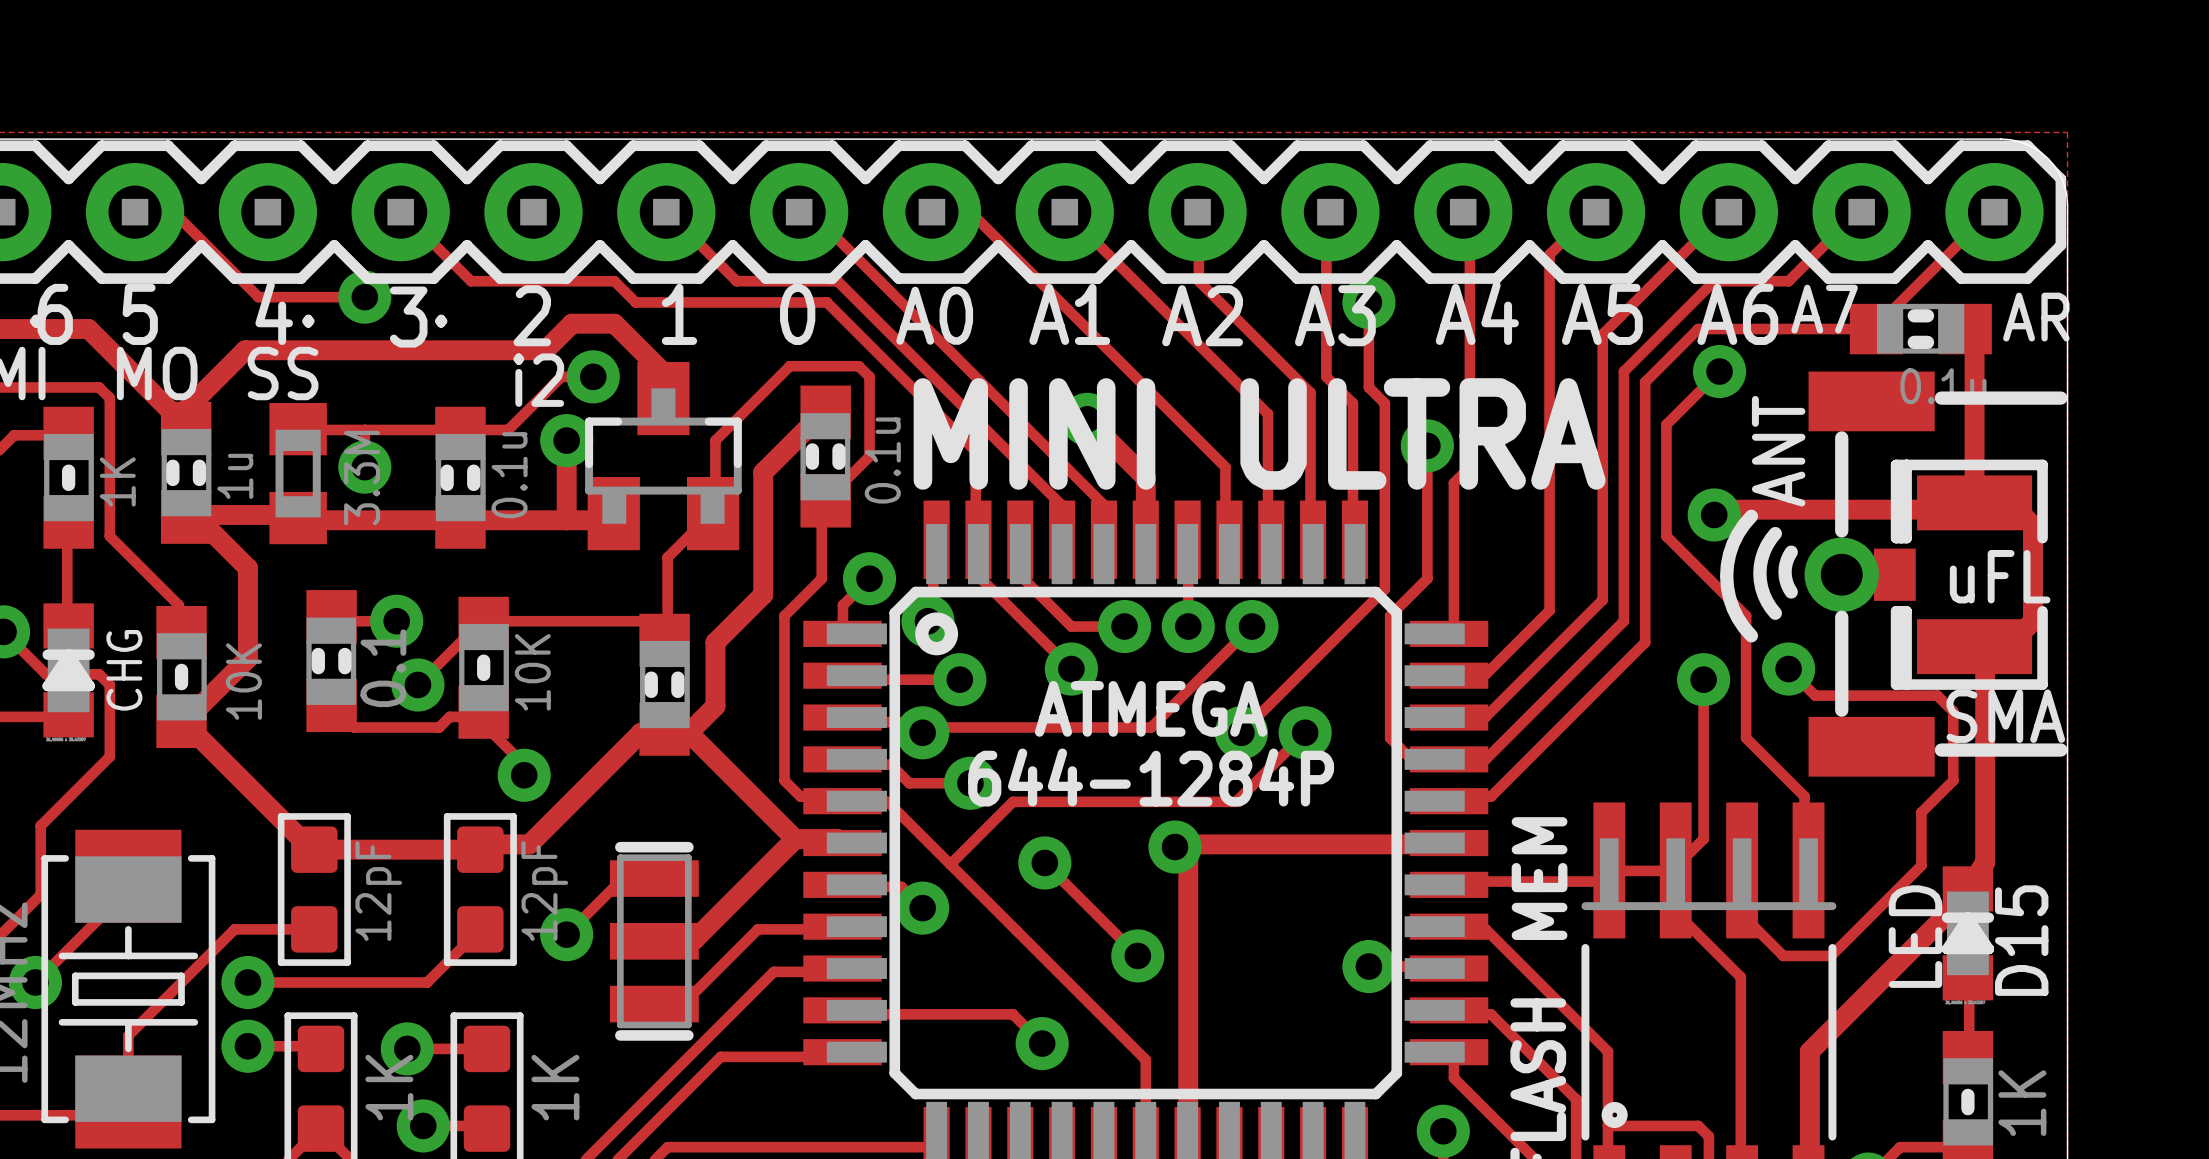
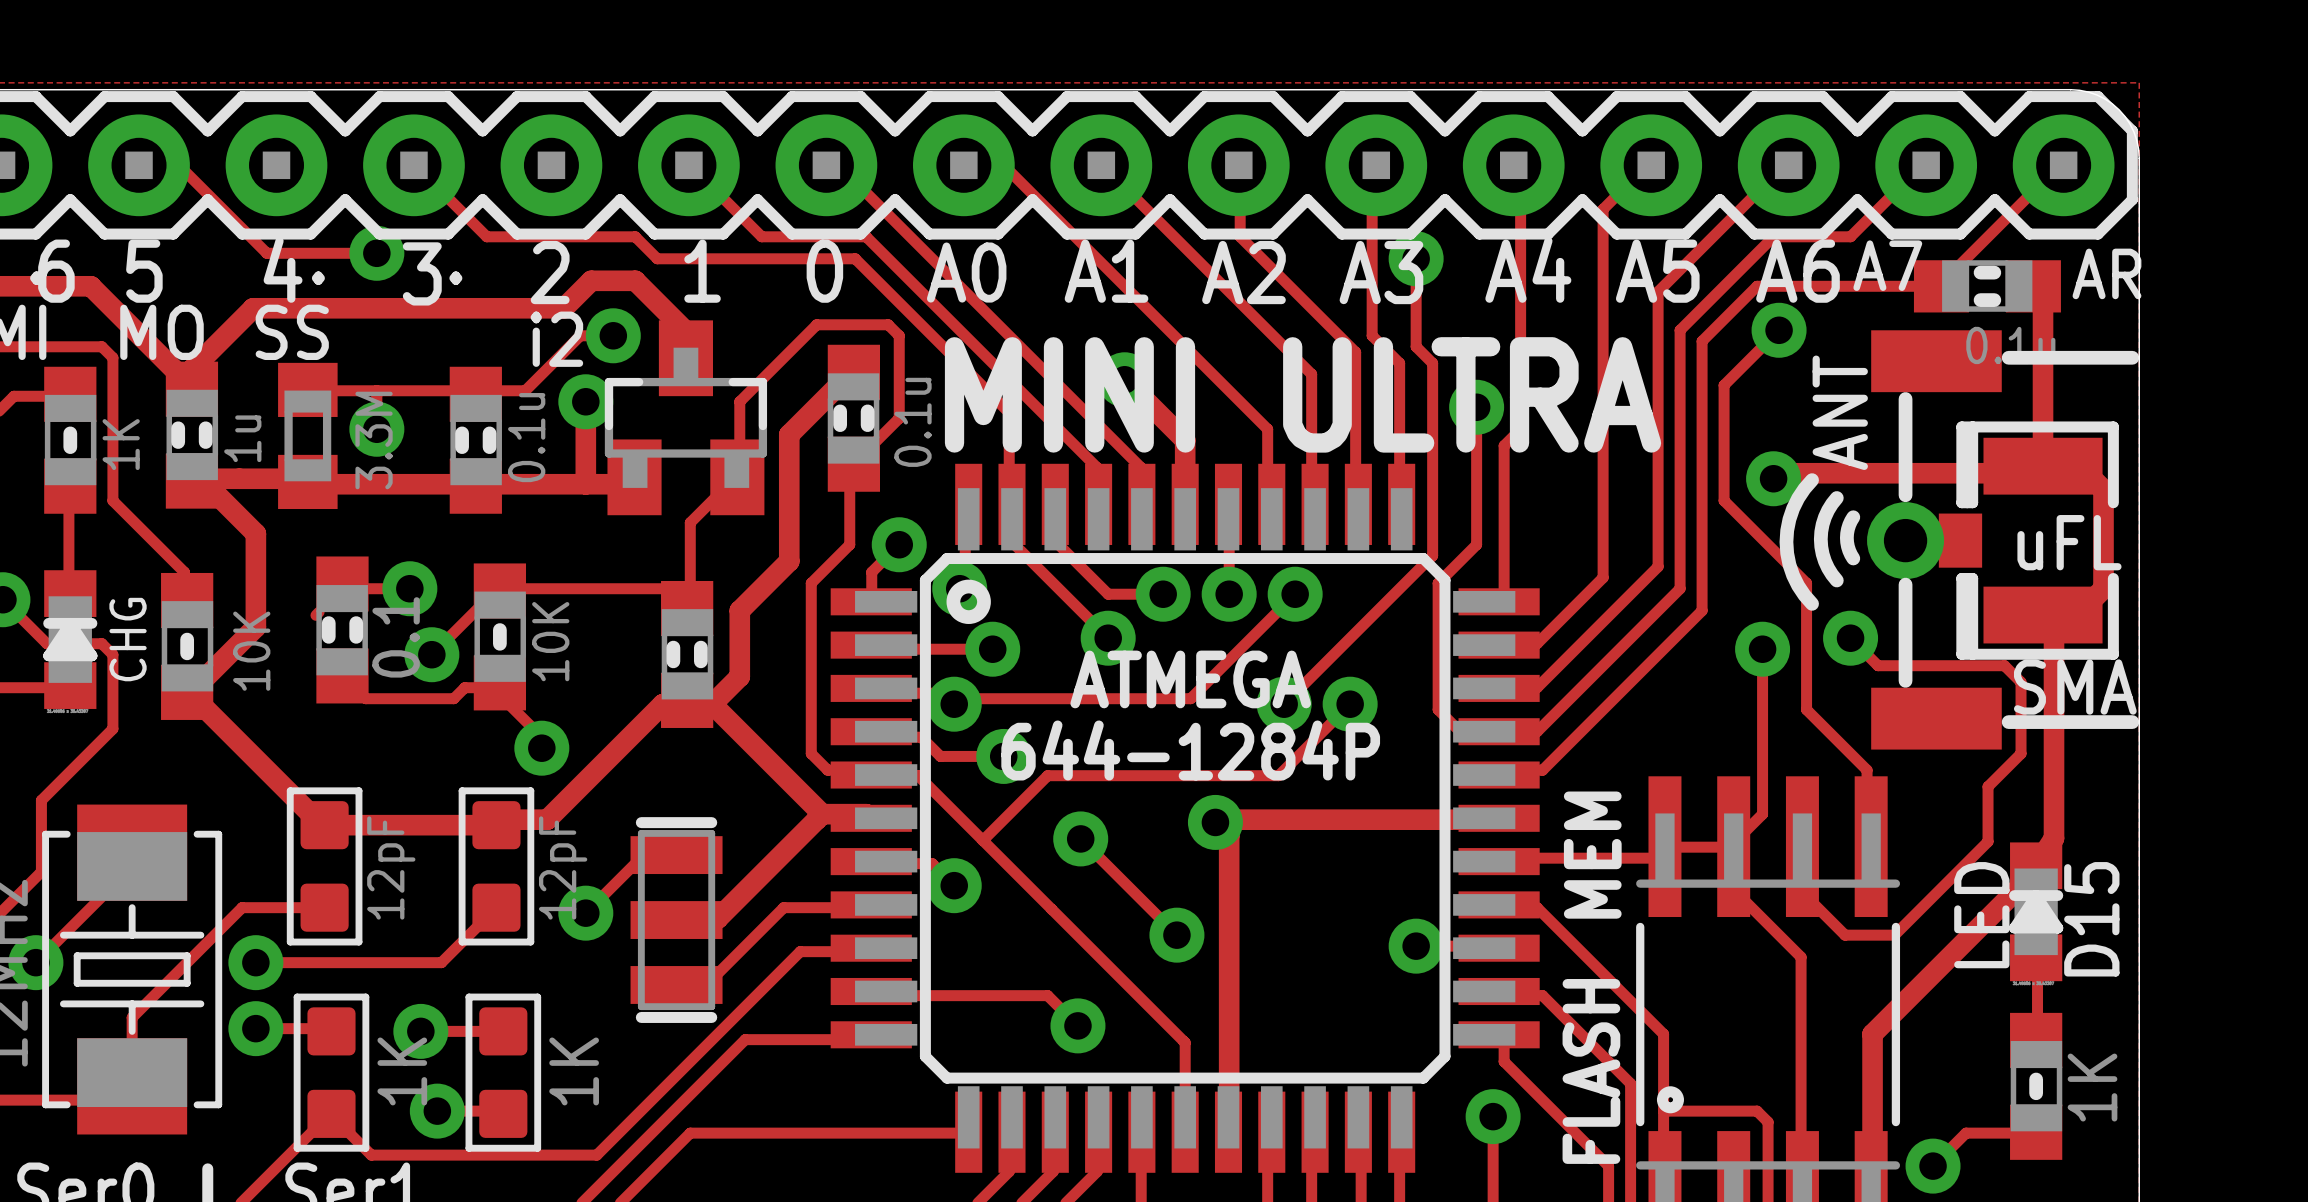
track: none -> (319, 612) (315, 615)

